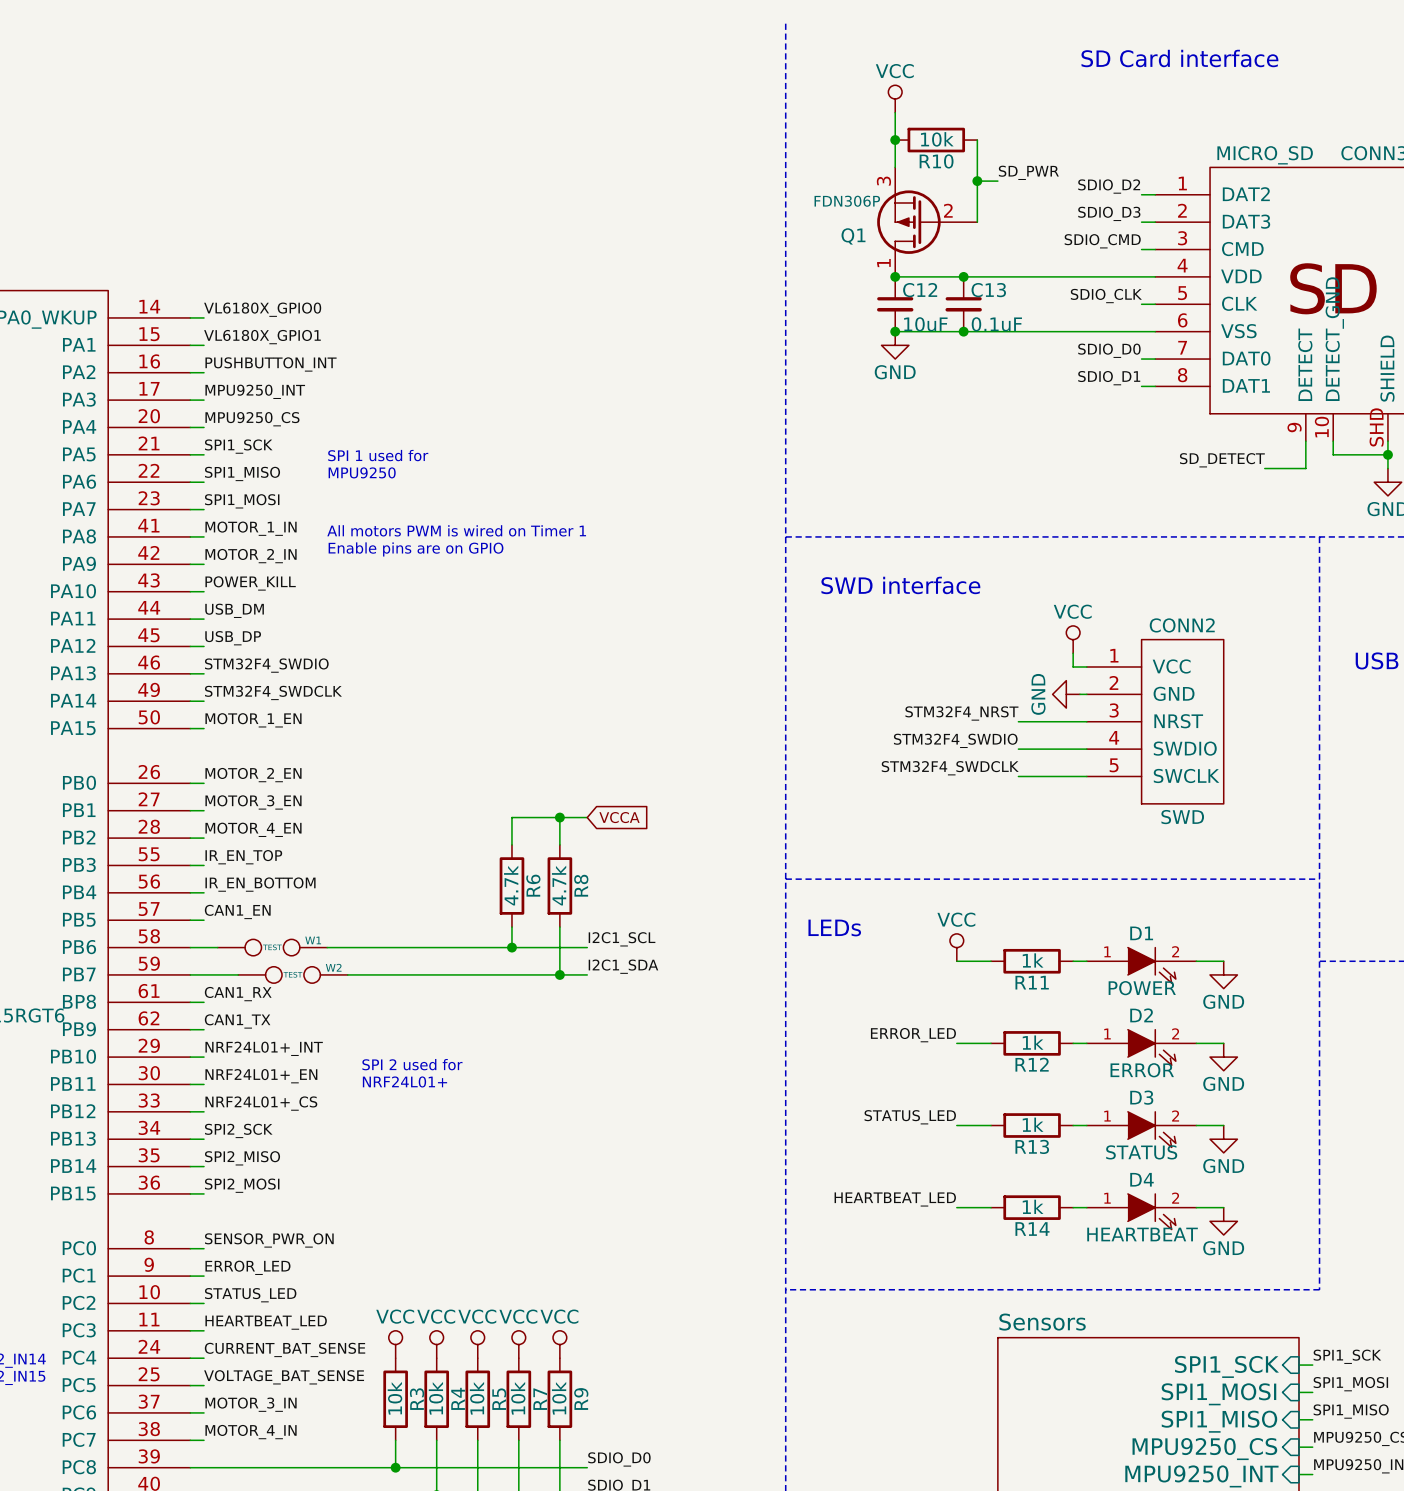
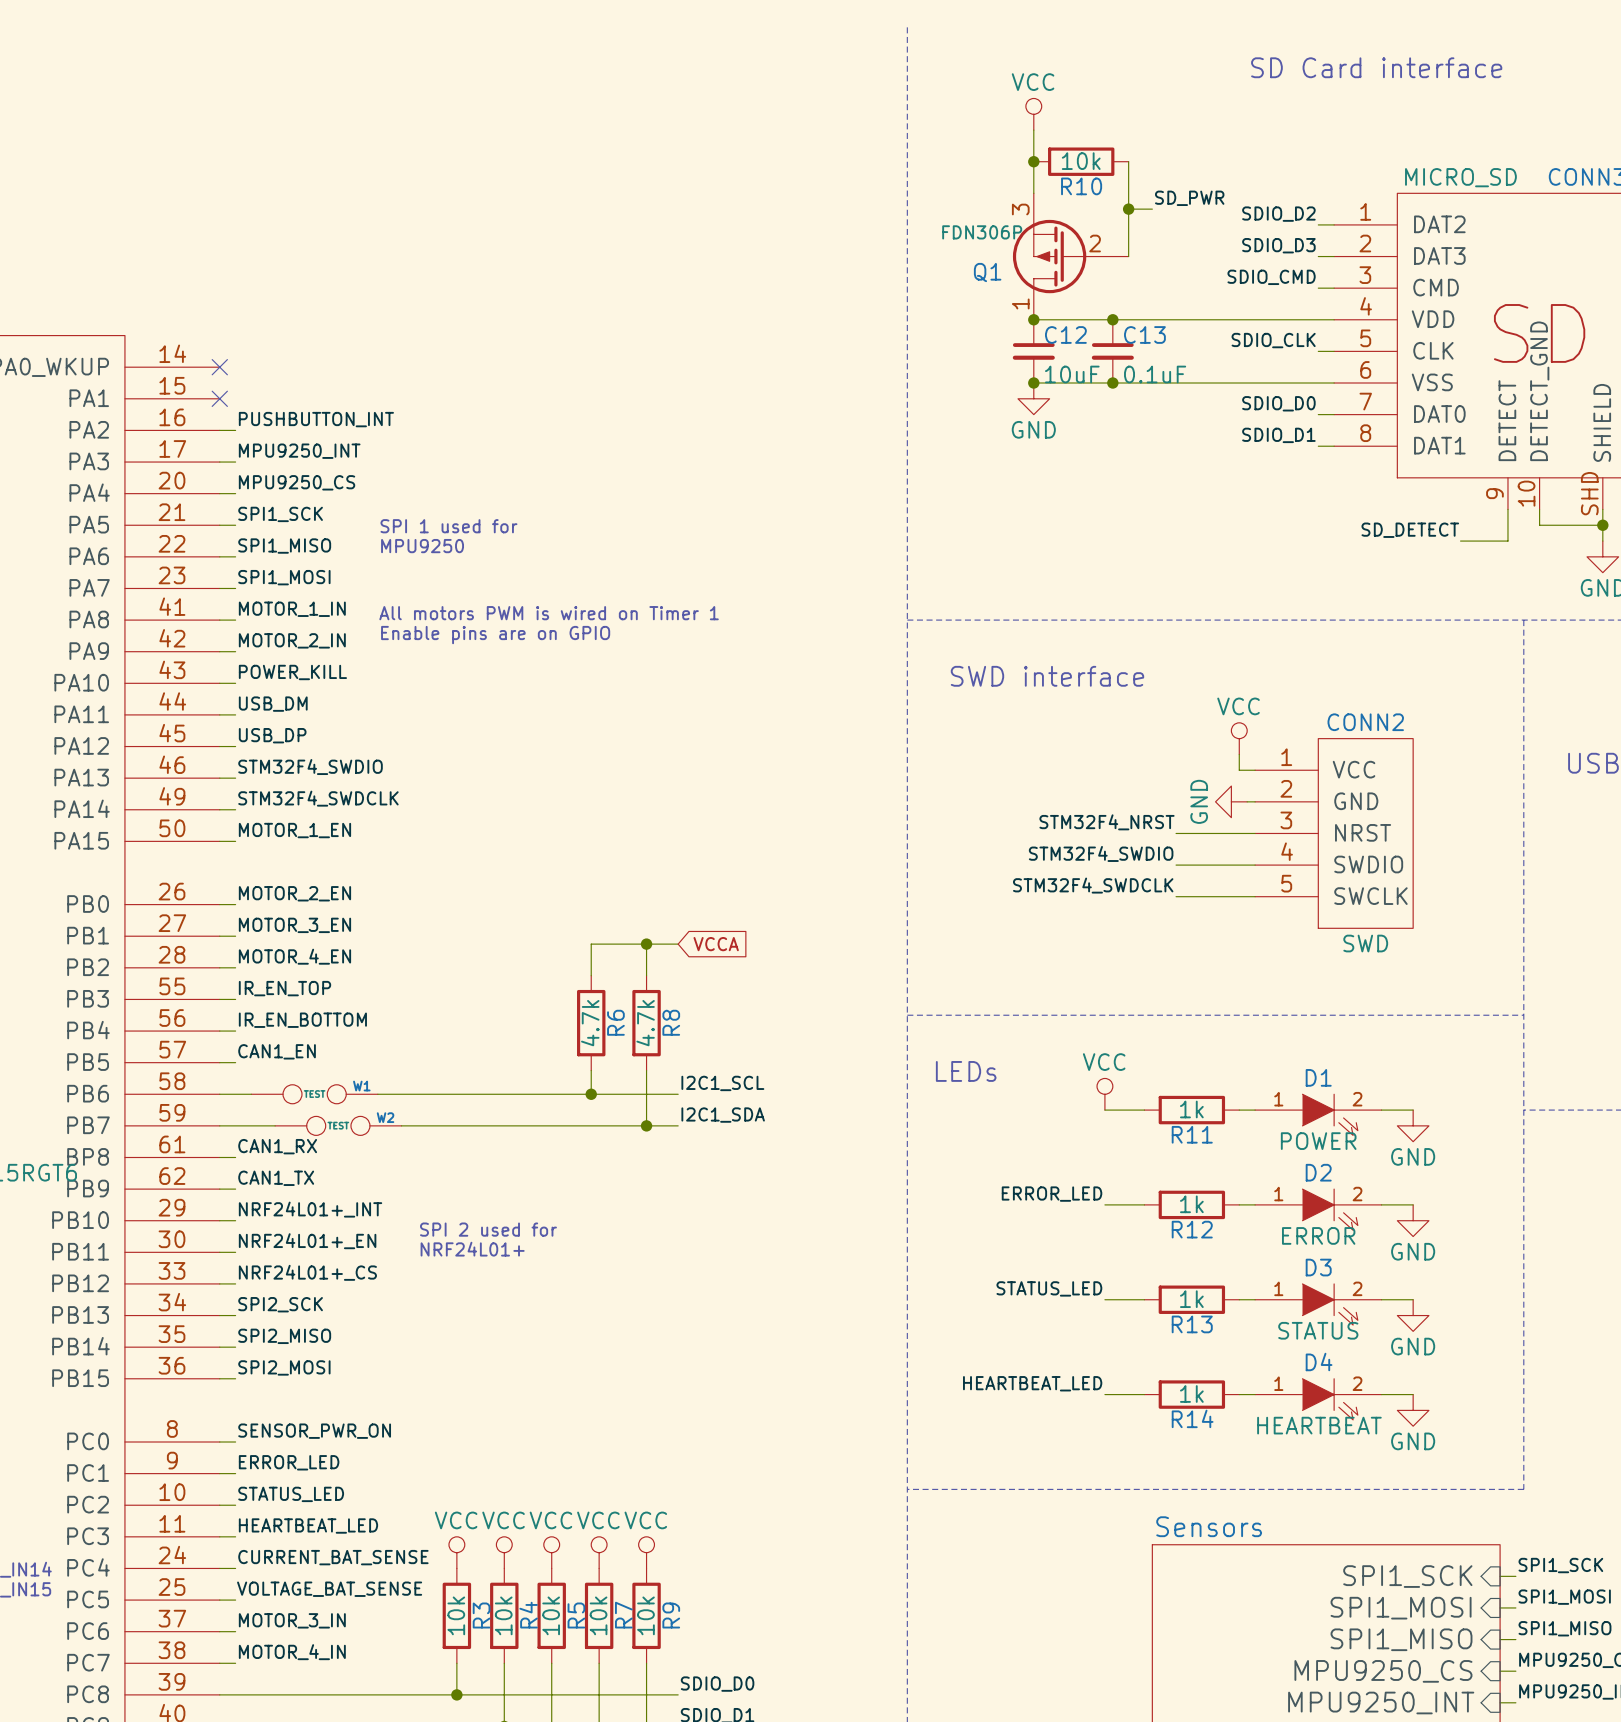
label: VL6180X_GPIO0 (262, 309) -> none
wire: (190, 317) (204, 317) -> none
no-connect mark: none -> (219, 367)
label: VL6180X_GPIO1 (262, 337) -> none
wire: (190, 345) (204, 345) -> none
no-connect mark: none -> (219, 398)

